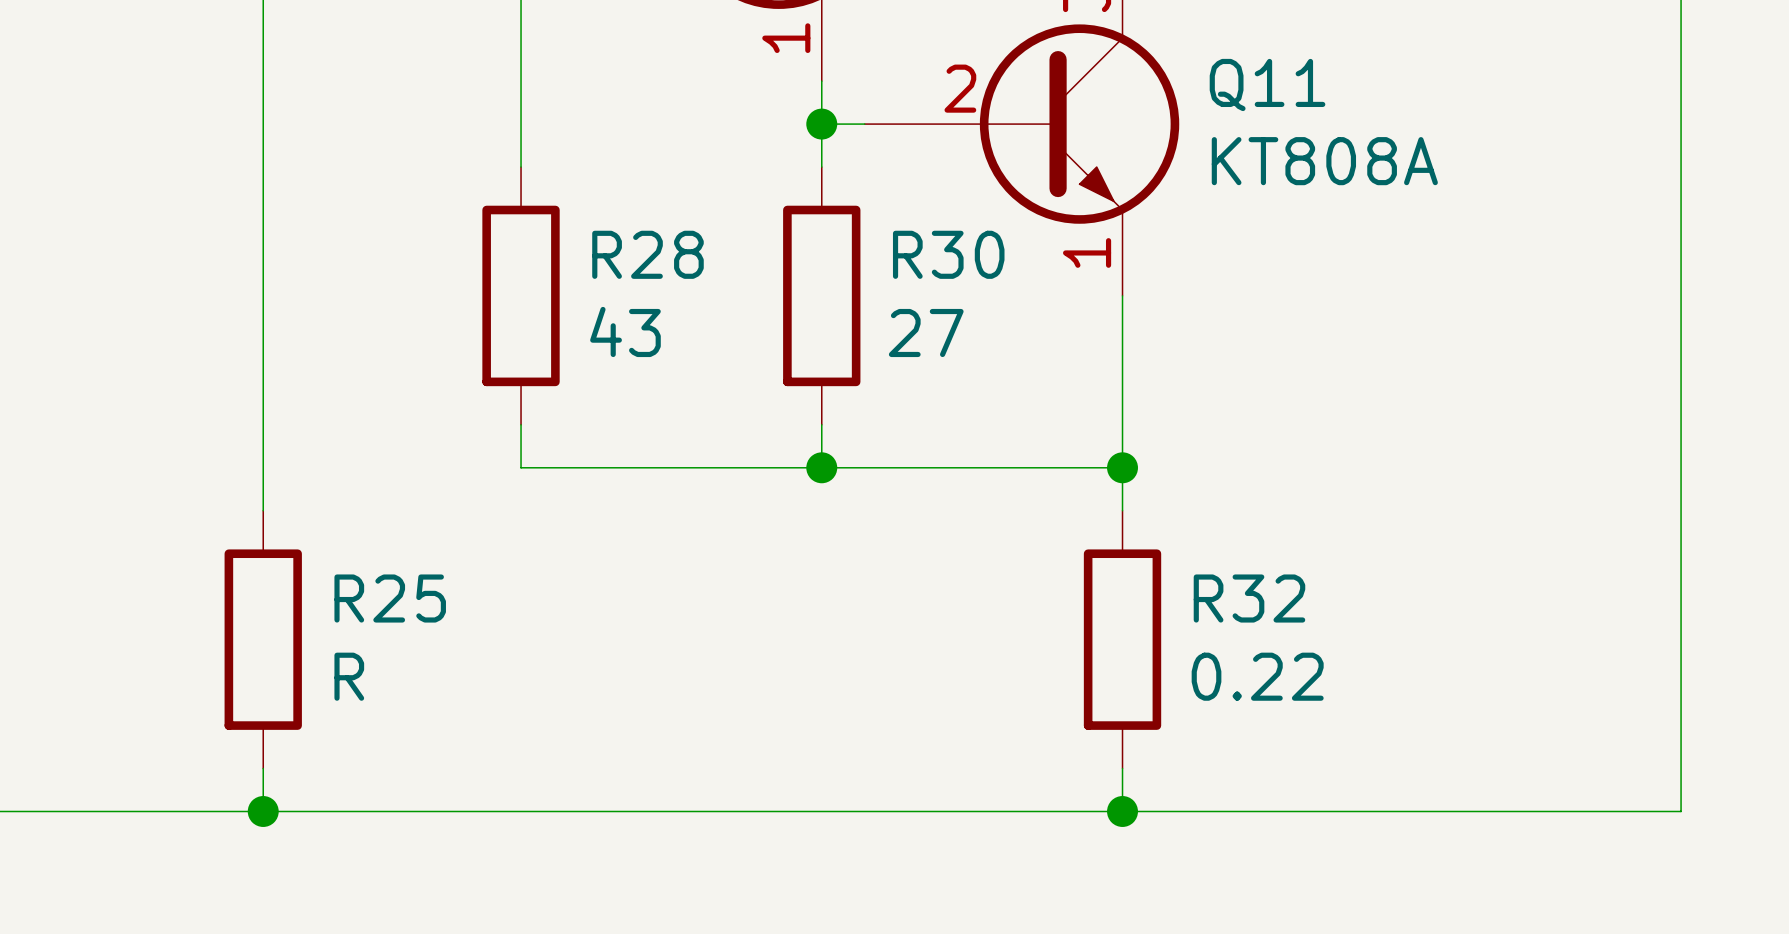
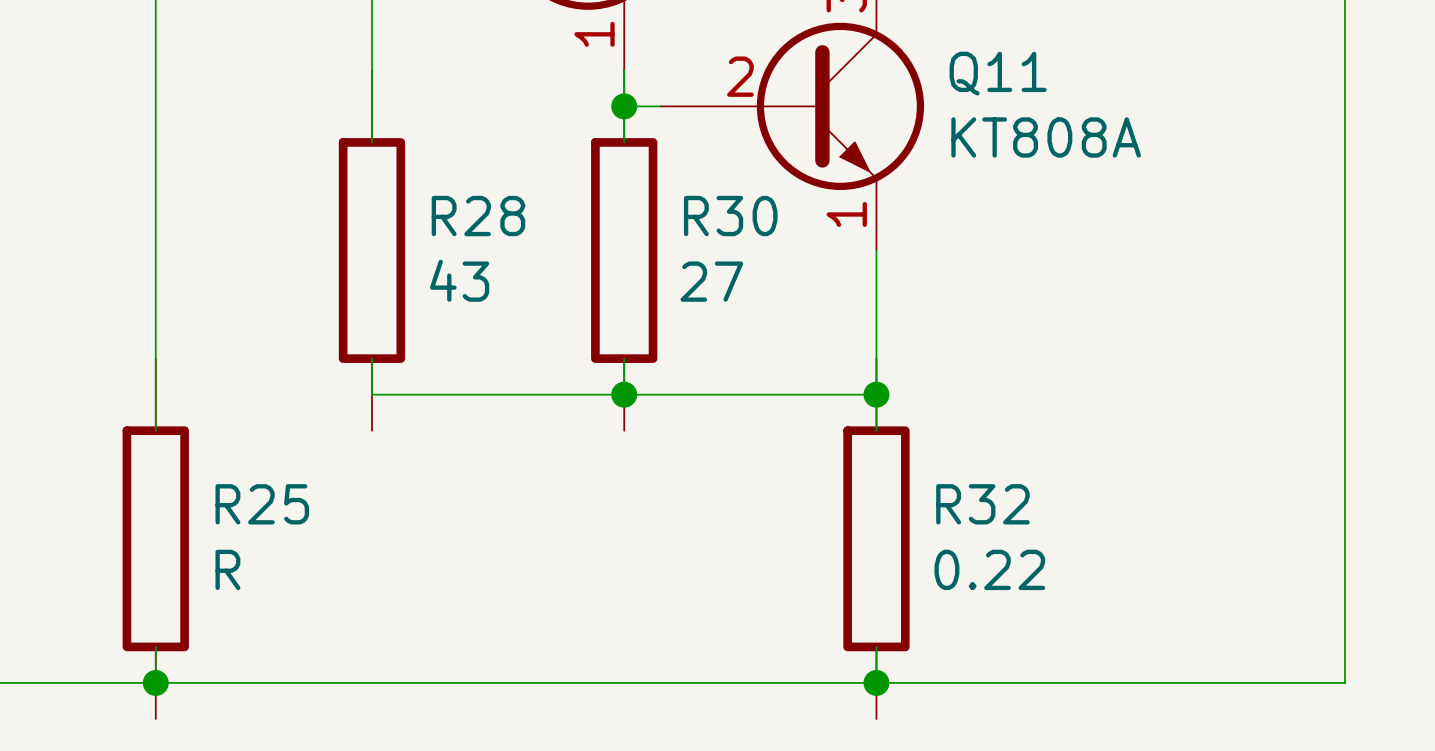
R28 symbol: [482, 167, 560, 425] -> [338, 70, 406, 431]
R30 symbol: [783, 167, 861, 425] -> [591, 70, 658, 431]
R25 symbol: [224, 510, 302, 769] -> [122, 358, 189, 719]
R32 symbol: [1083, 510, 1162, 769] -> [843, 358, 910, 719]

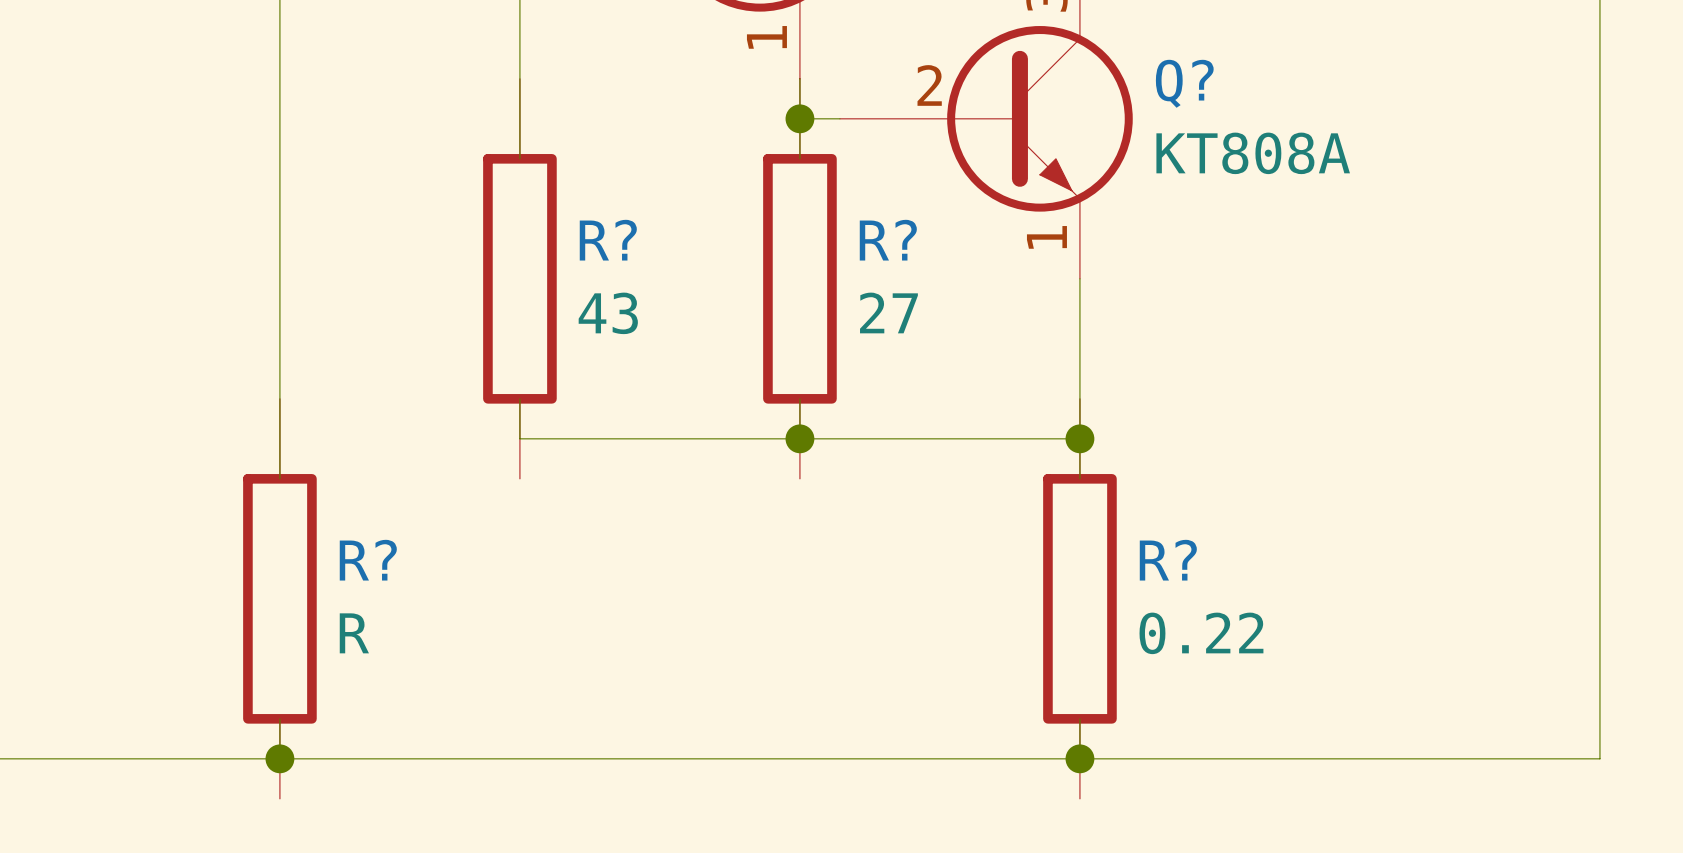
Q11 name: Q11 (998, 73) -> Q? (1184, 83)
R28 name: R28 (478, 216) -> R? (608, 240)
R30 name: R30 (730, 216) -> R? (888, 240)
R25 name: R25 (262, 504) -> R? (368, 560)
R32 name: R32 (982, 504) -> R? (1168, 560)

